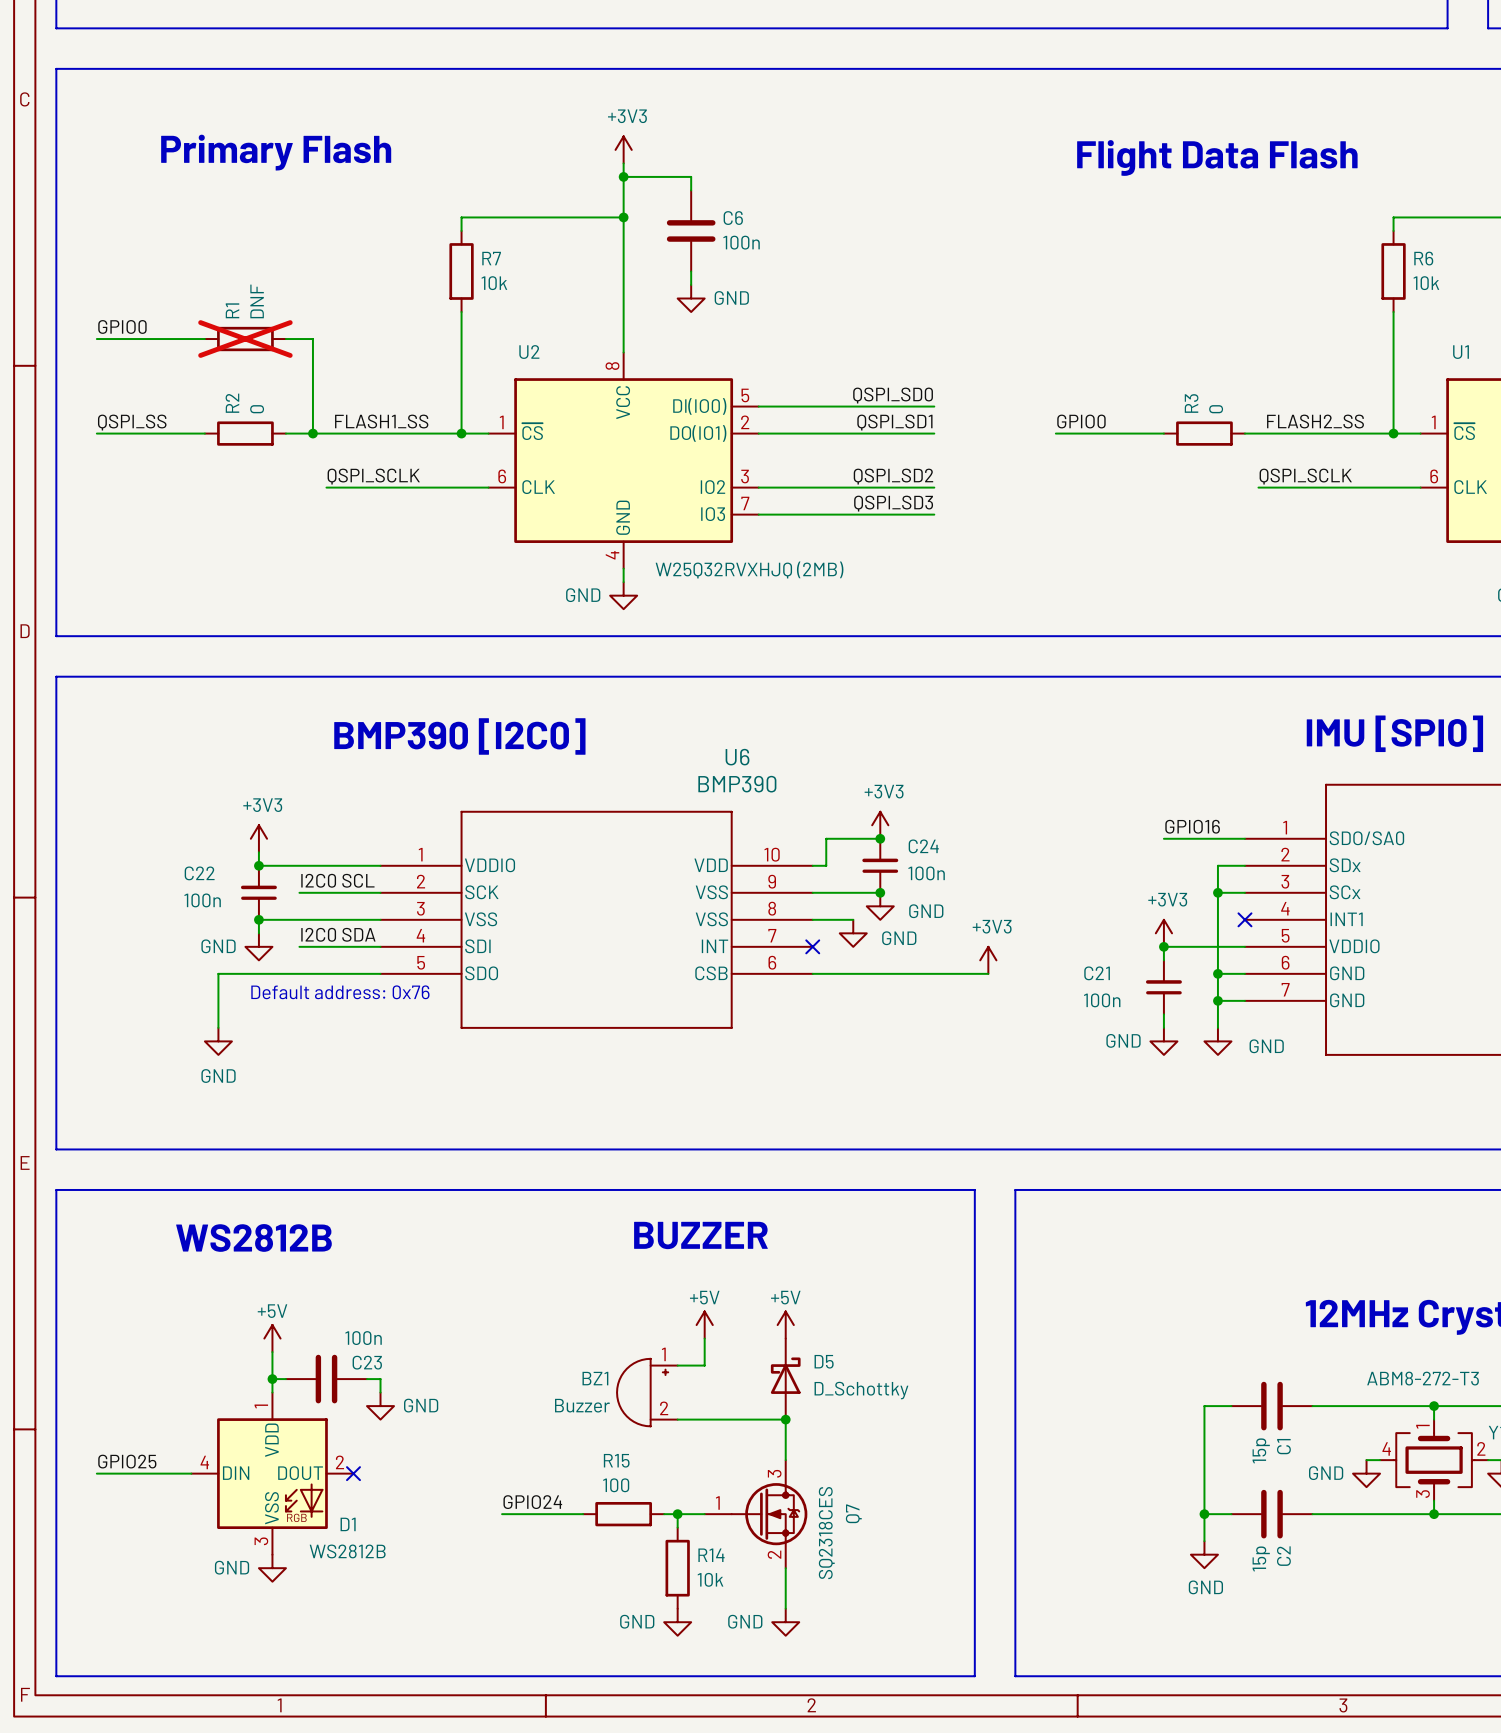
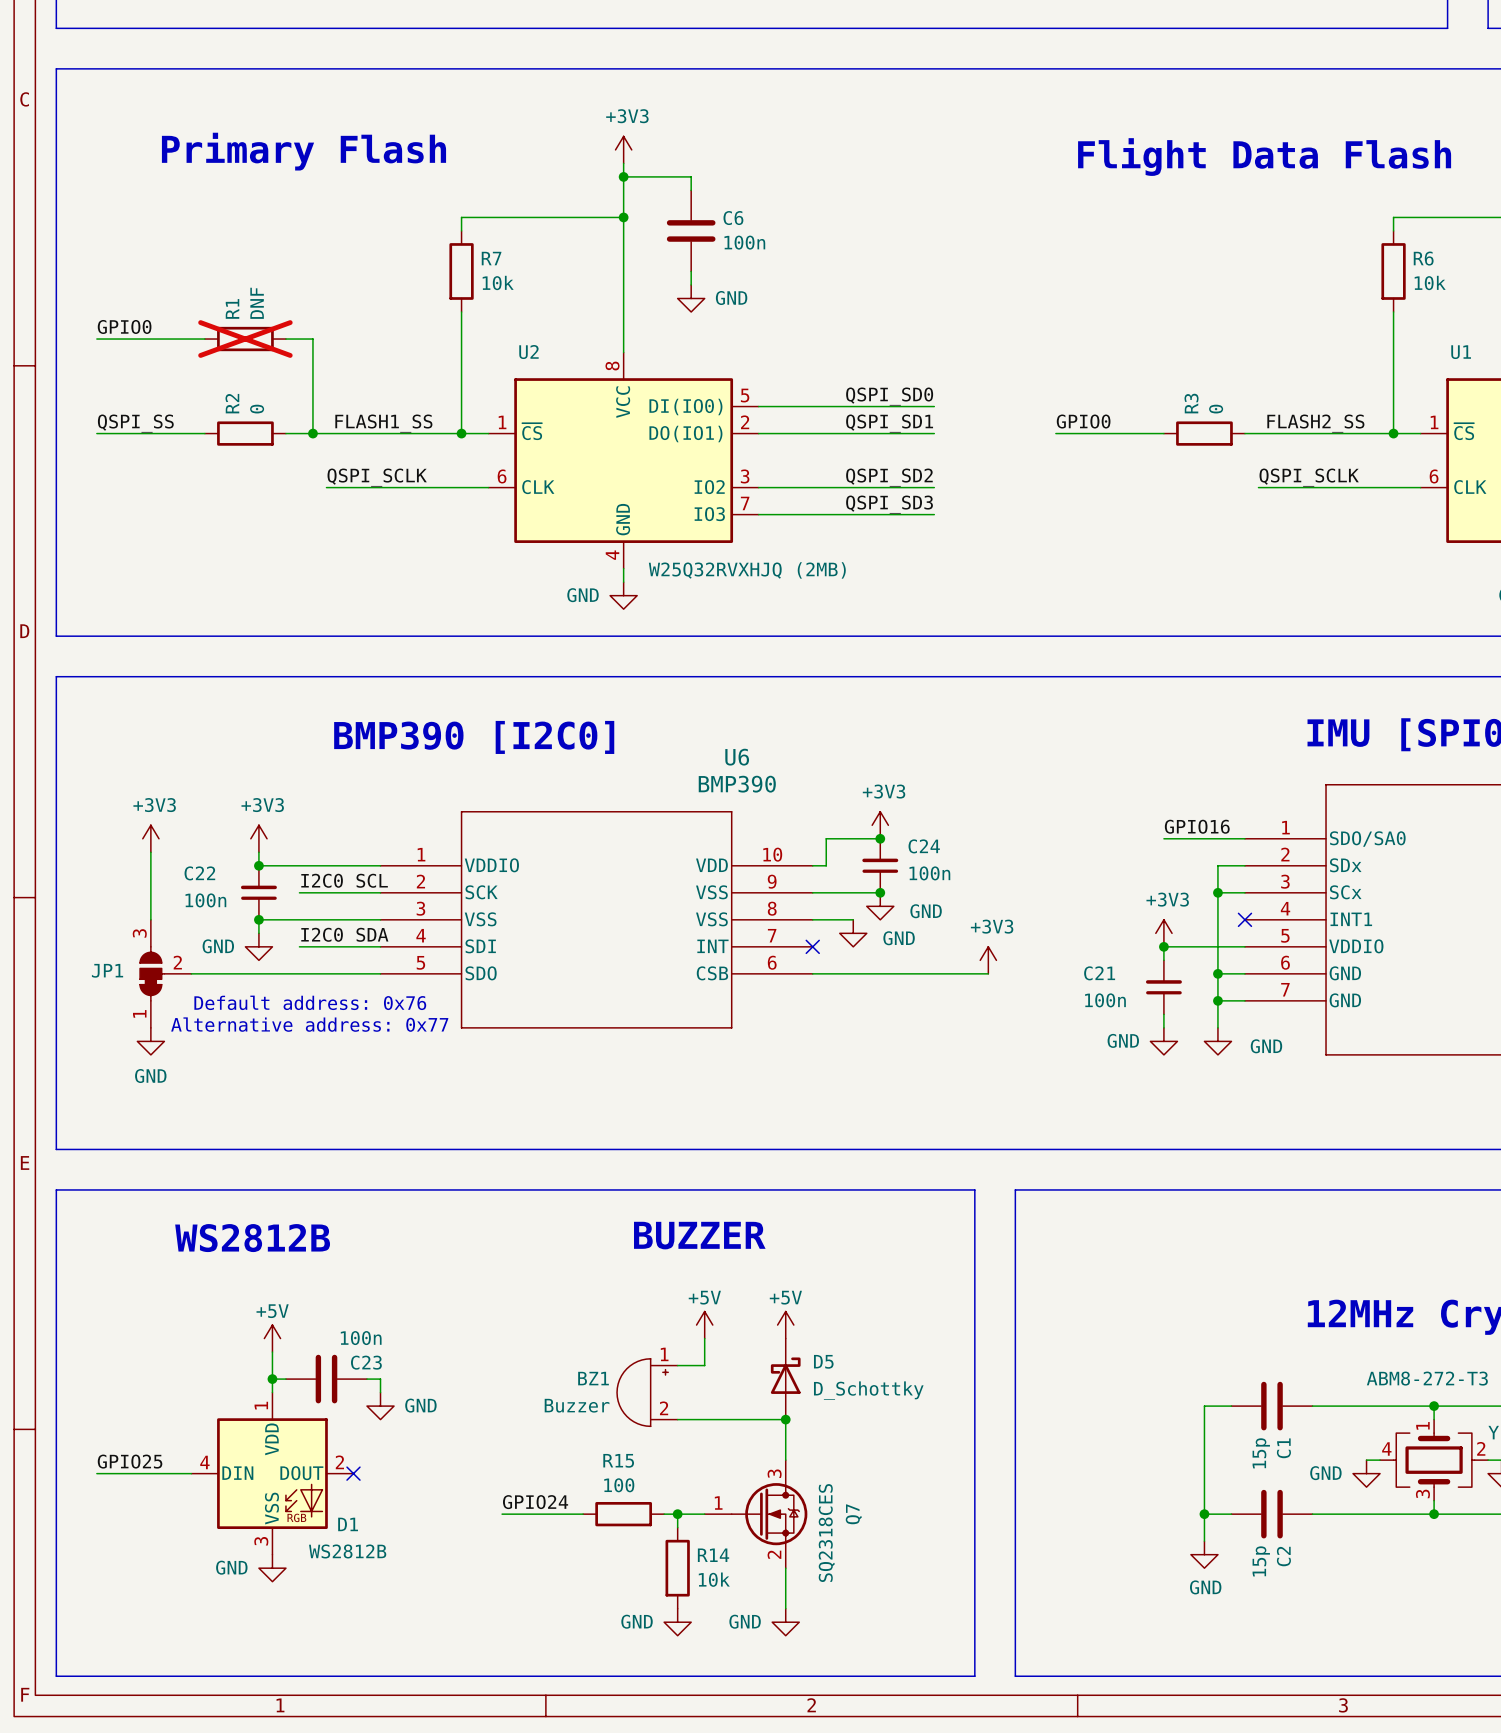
power symbol: none -> +3V3 (150, 838)
wire: none -> (150, 852) (150, 919)
JP1: none -> (165, 973)
wire: (218, 973) (218, 1027) -> (218, 973) (191, 973)
text position: Default address: 0x76 (340, 992) -> Default address: 0x76 (310, 1002)
text: none -> Alternative address: 0x77 (309, 1024)
power symbol position: GND (218, 1041) -> GND (150, 1041)

